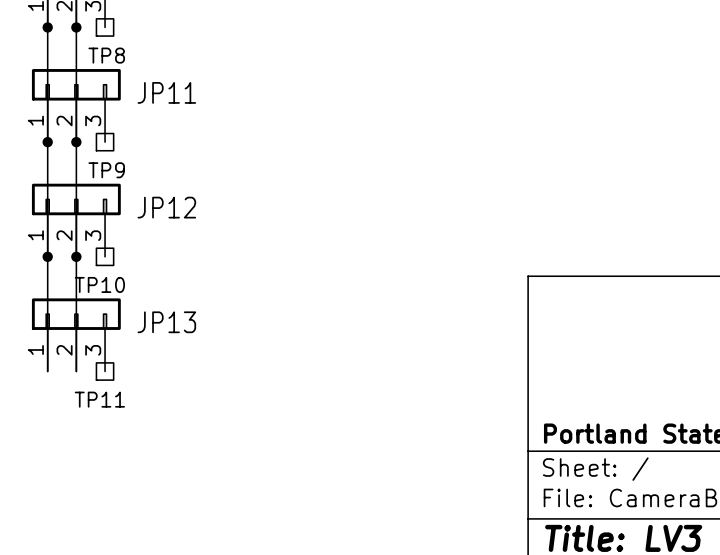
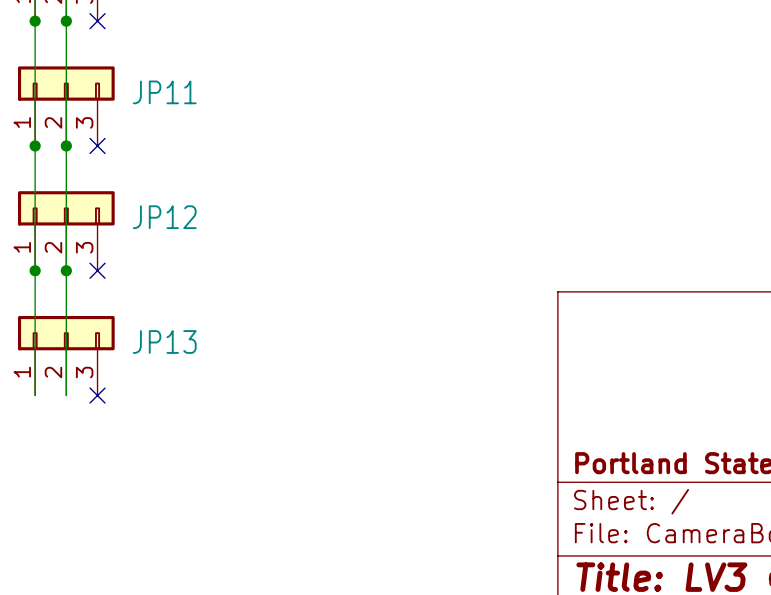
TP8: (105, 27) -> none
no-connect mark: none -> (97, 21)
TP9: (105, 142) -> none
no-connect mark: none -> (97, 145)
TP10: (105, 256) -> none
no-connect mark: none -> (97, 270)
TP11: (105, 371) -> none
no-connect mark: none -> (97, 395)

